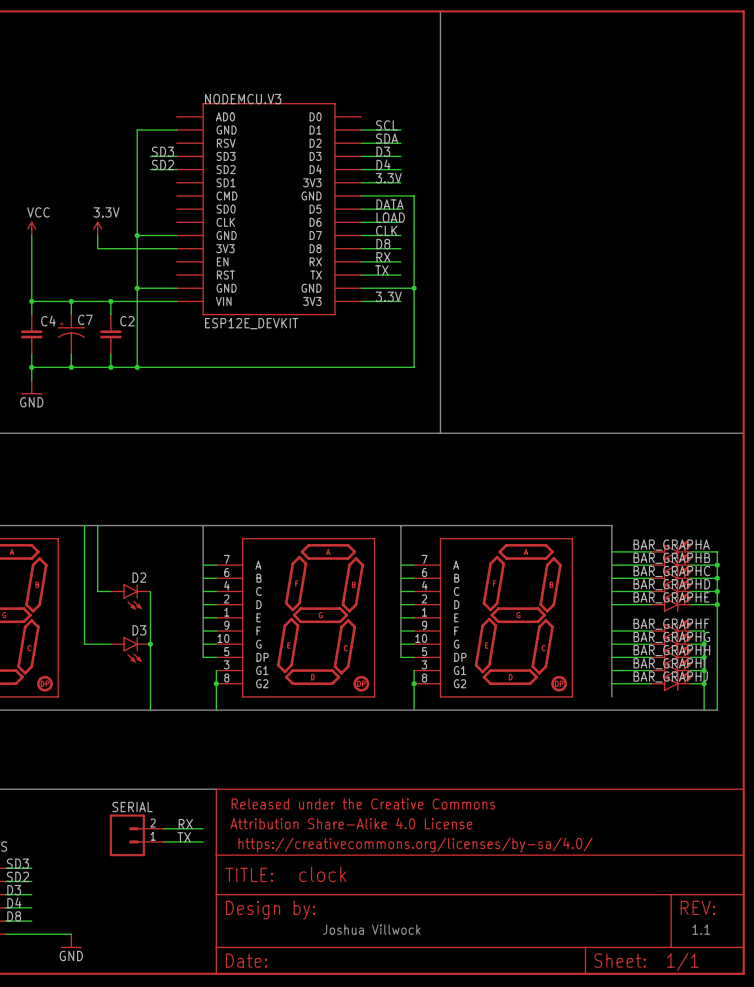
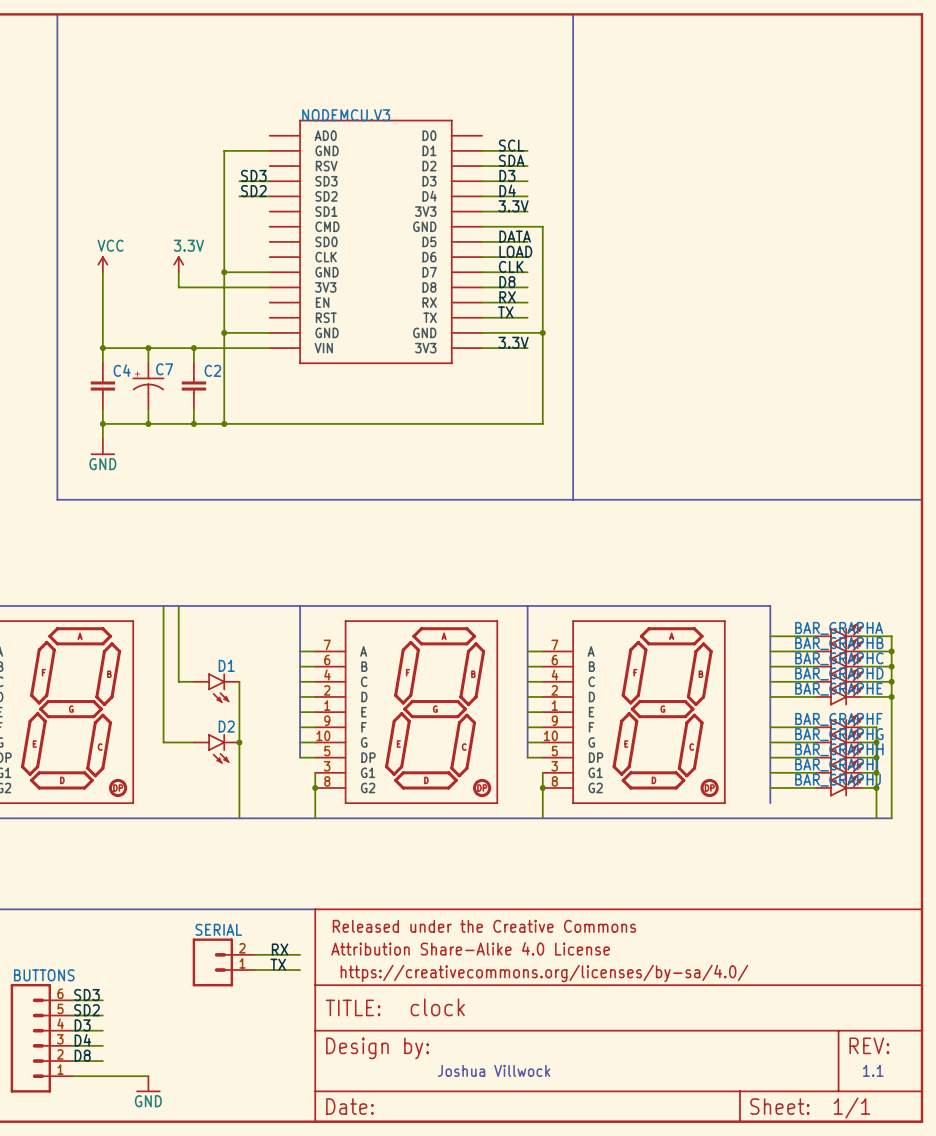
NODEMCU.V3 value: ESP12E_DEVKIT (251, 323) -> none
D2 name: D2 (139, 577) -> D1 (226, 665)
D3 name: D3 (139, 630) -> D2 (226, 726)

